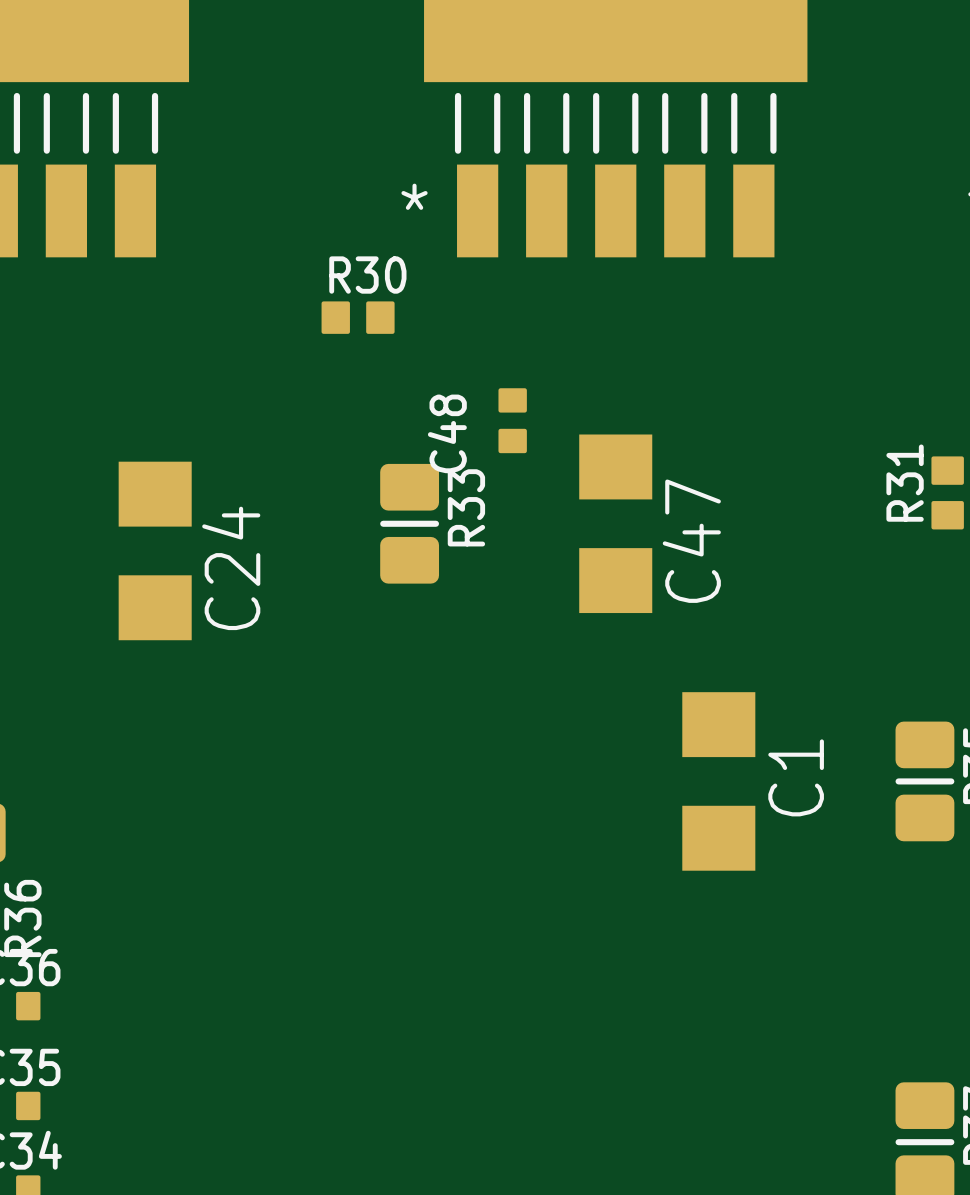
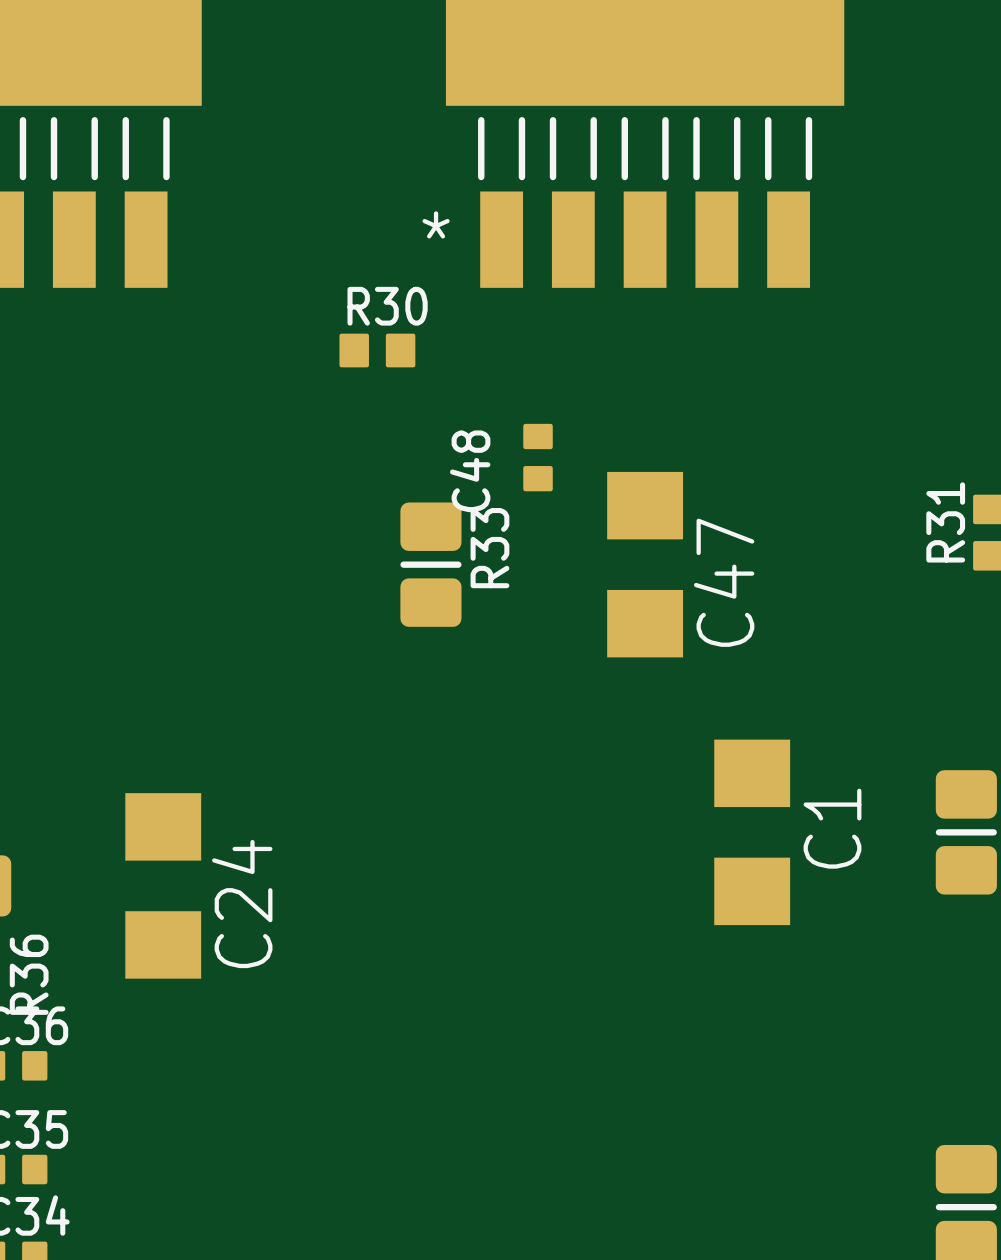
C24 position: (155, 550) -> (163, 885)

